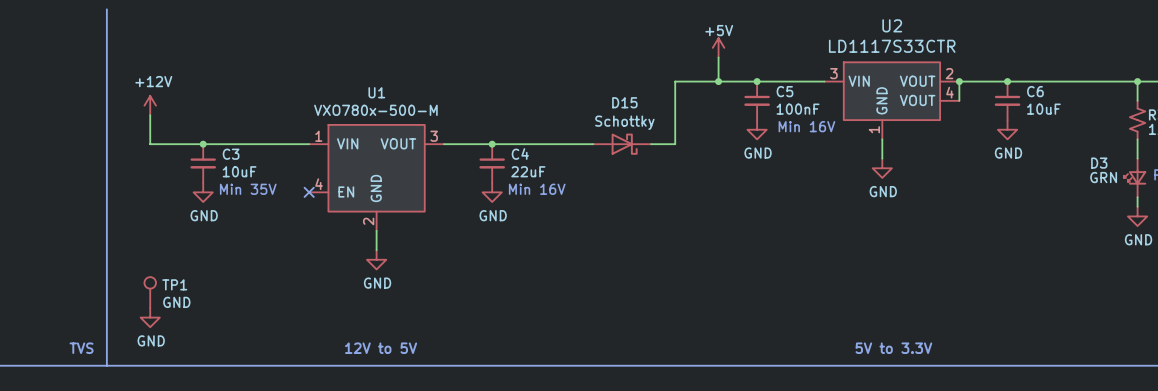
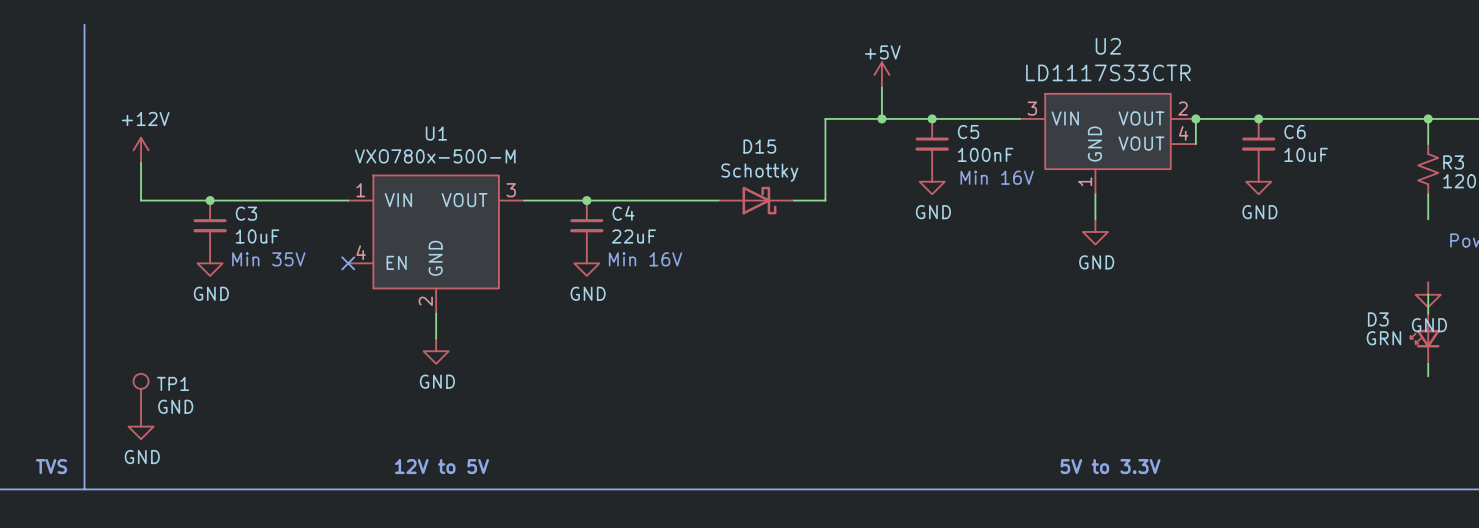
D3 position: (1135, 177) -> (1425, 338)
wire: (1137, 197) (1137, 206) -> (1428, 363) (1428, 376)
wire: none -> (1428, 294) (1428, 313)

